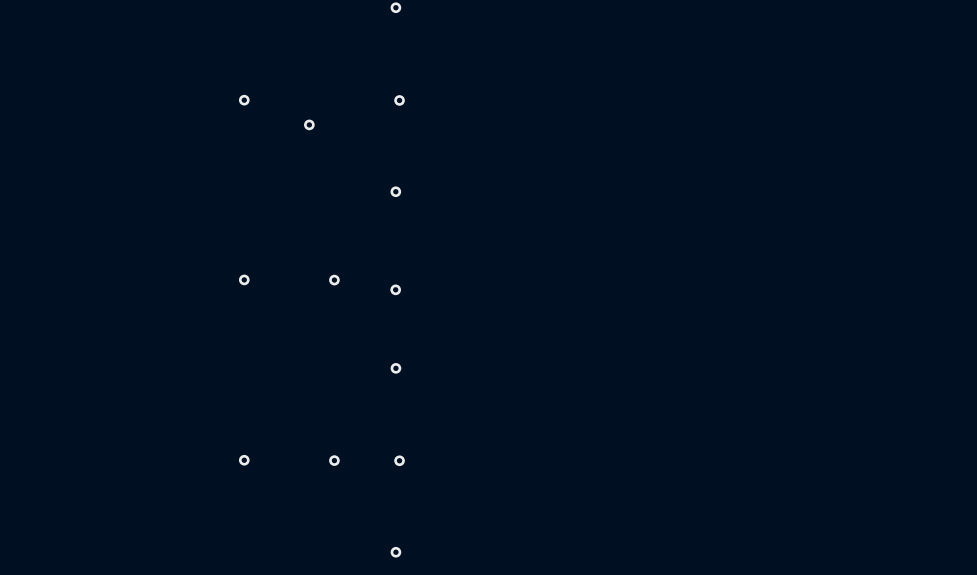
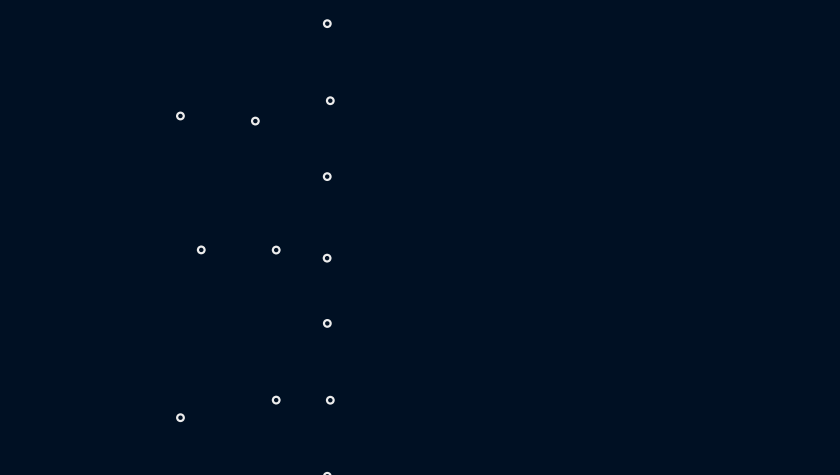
via position: (244, 100) -> (180, 115)
via position: (244, 460) -> (180, 417)

